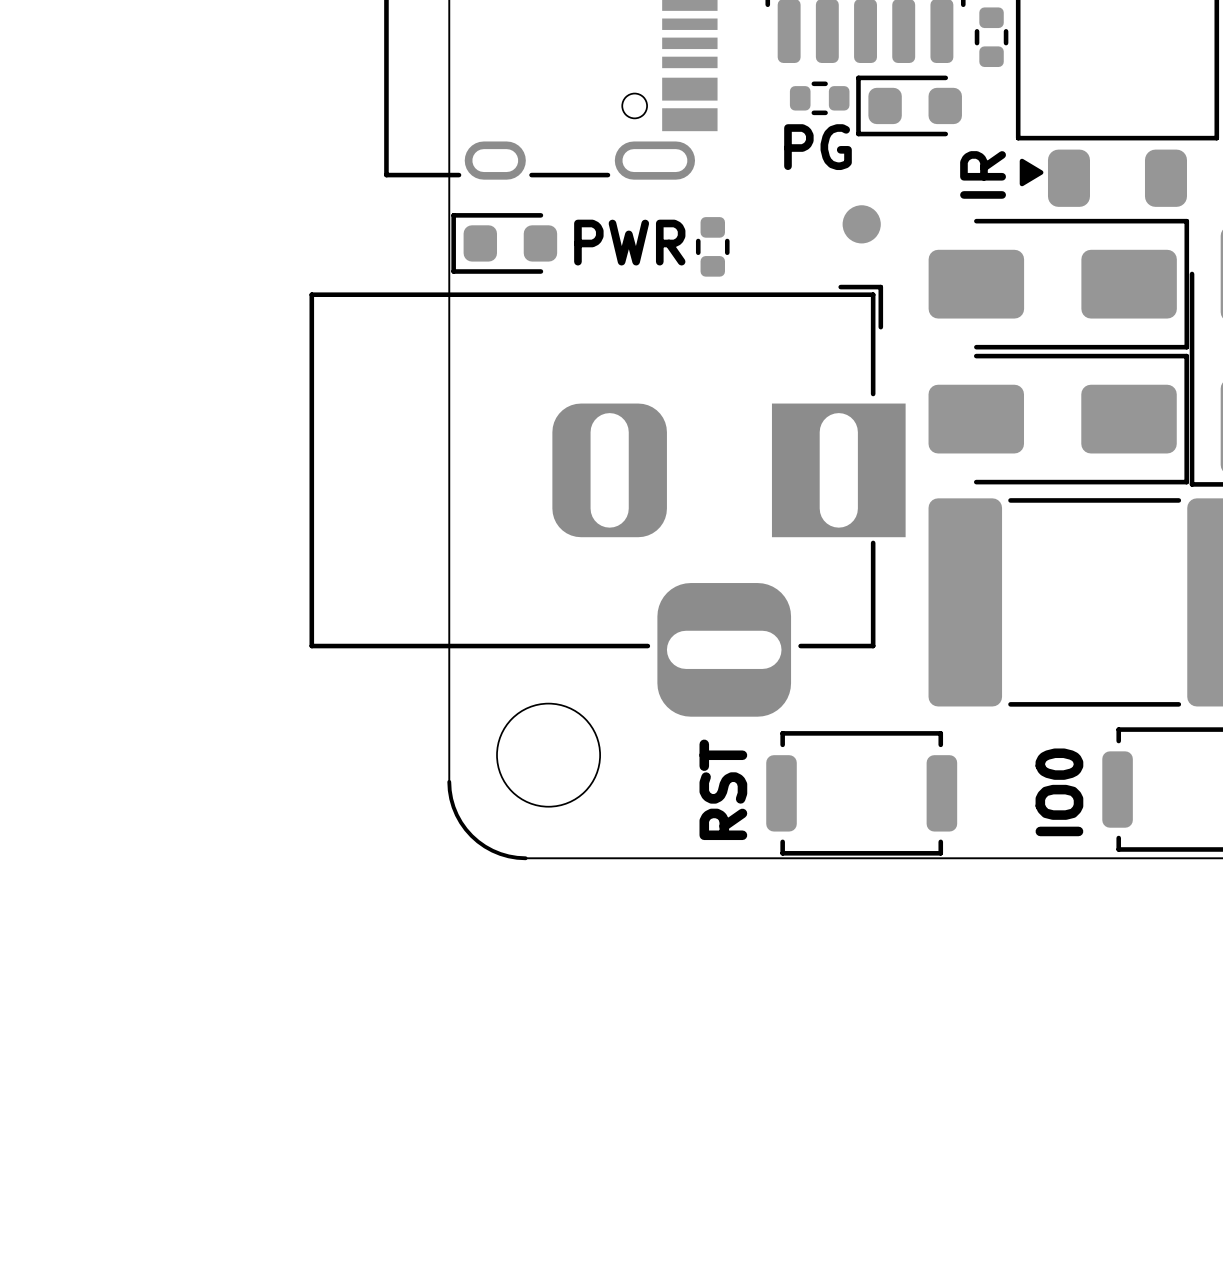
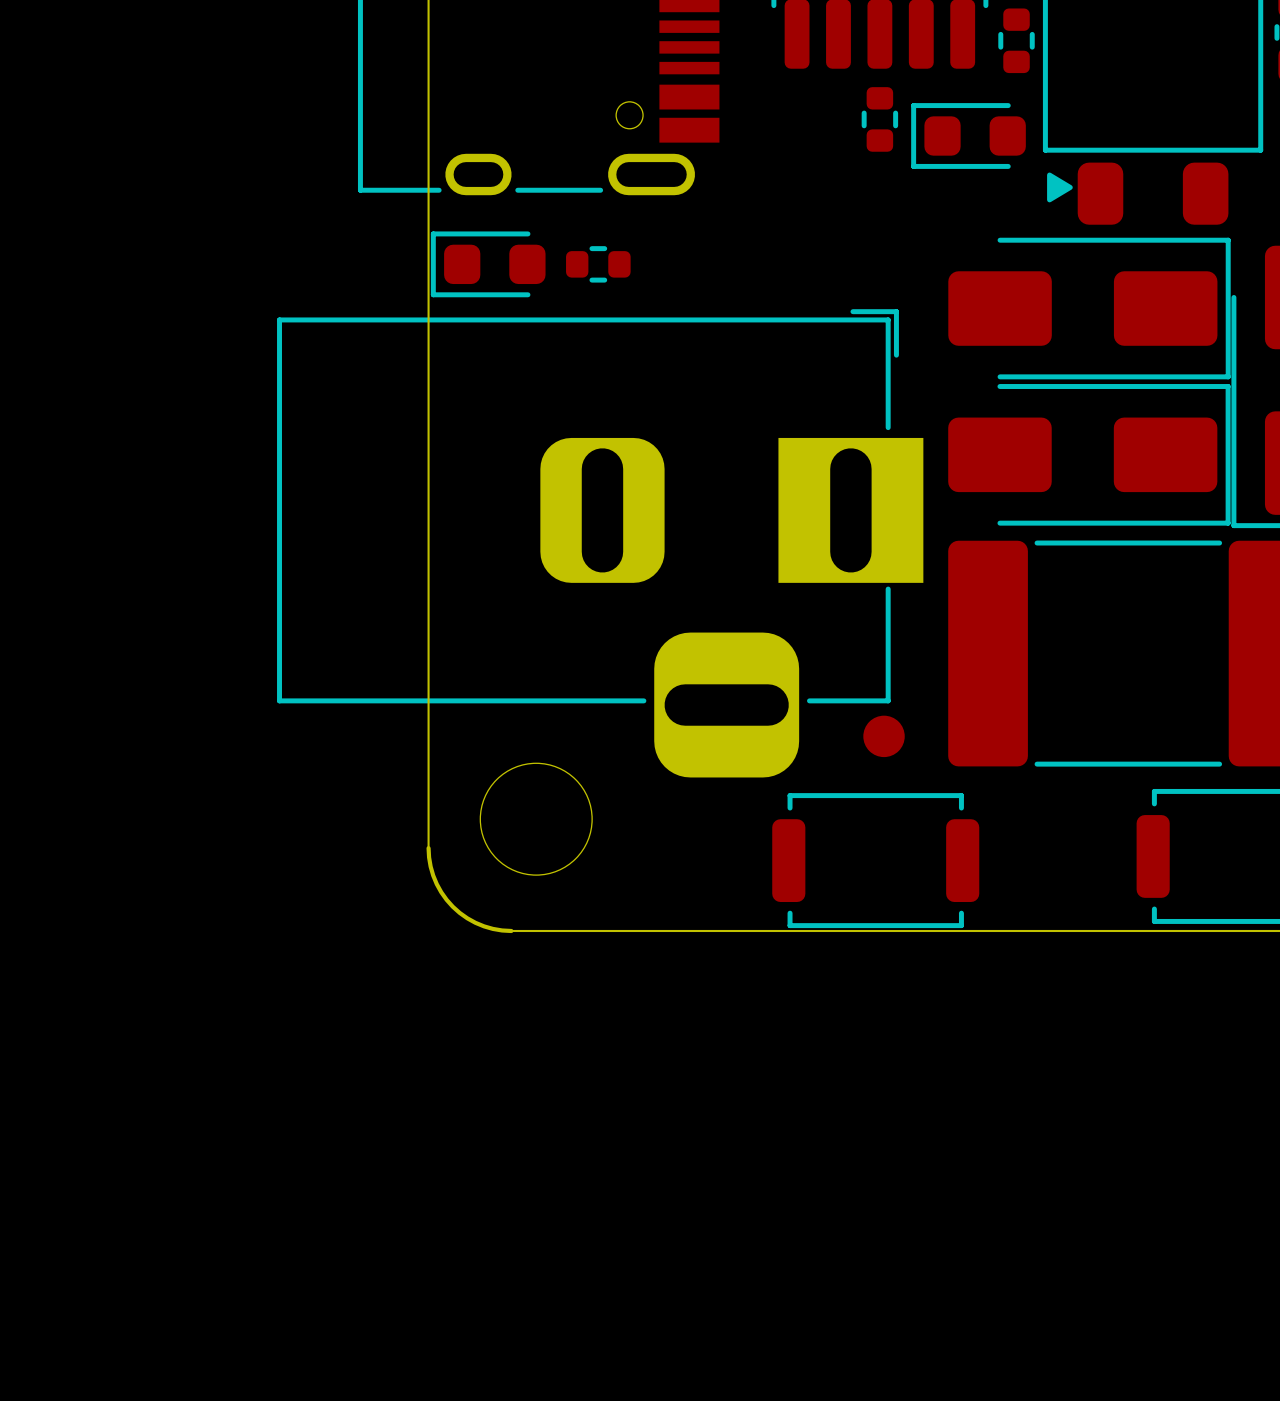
part rotation: 0° (819, 98) -> 90° clockwise (879, 119)
part position: (819, 98) -> (879, 119)
part position: (909, 105) -> (968, 136)
text: PG (817, 147) -> none
text: IR (983, 174) -> none
part position: (861, 224) -> (884, 736)
text: PWR (629, 242) -> none
part: none -> (598, 264)
part: (712, 246) -> none
text: RST (723, 789) -> none
text: IO0 (1059, 792) -> none

